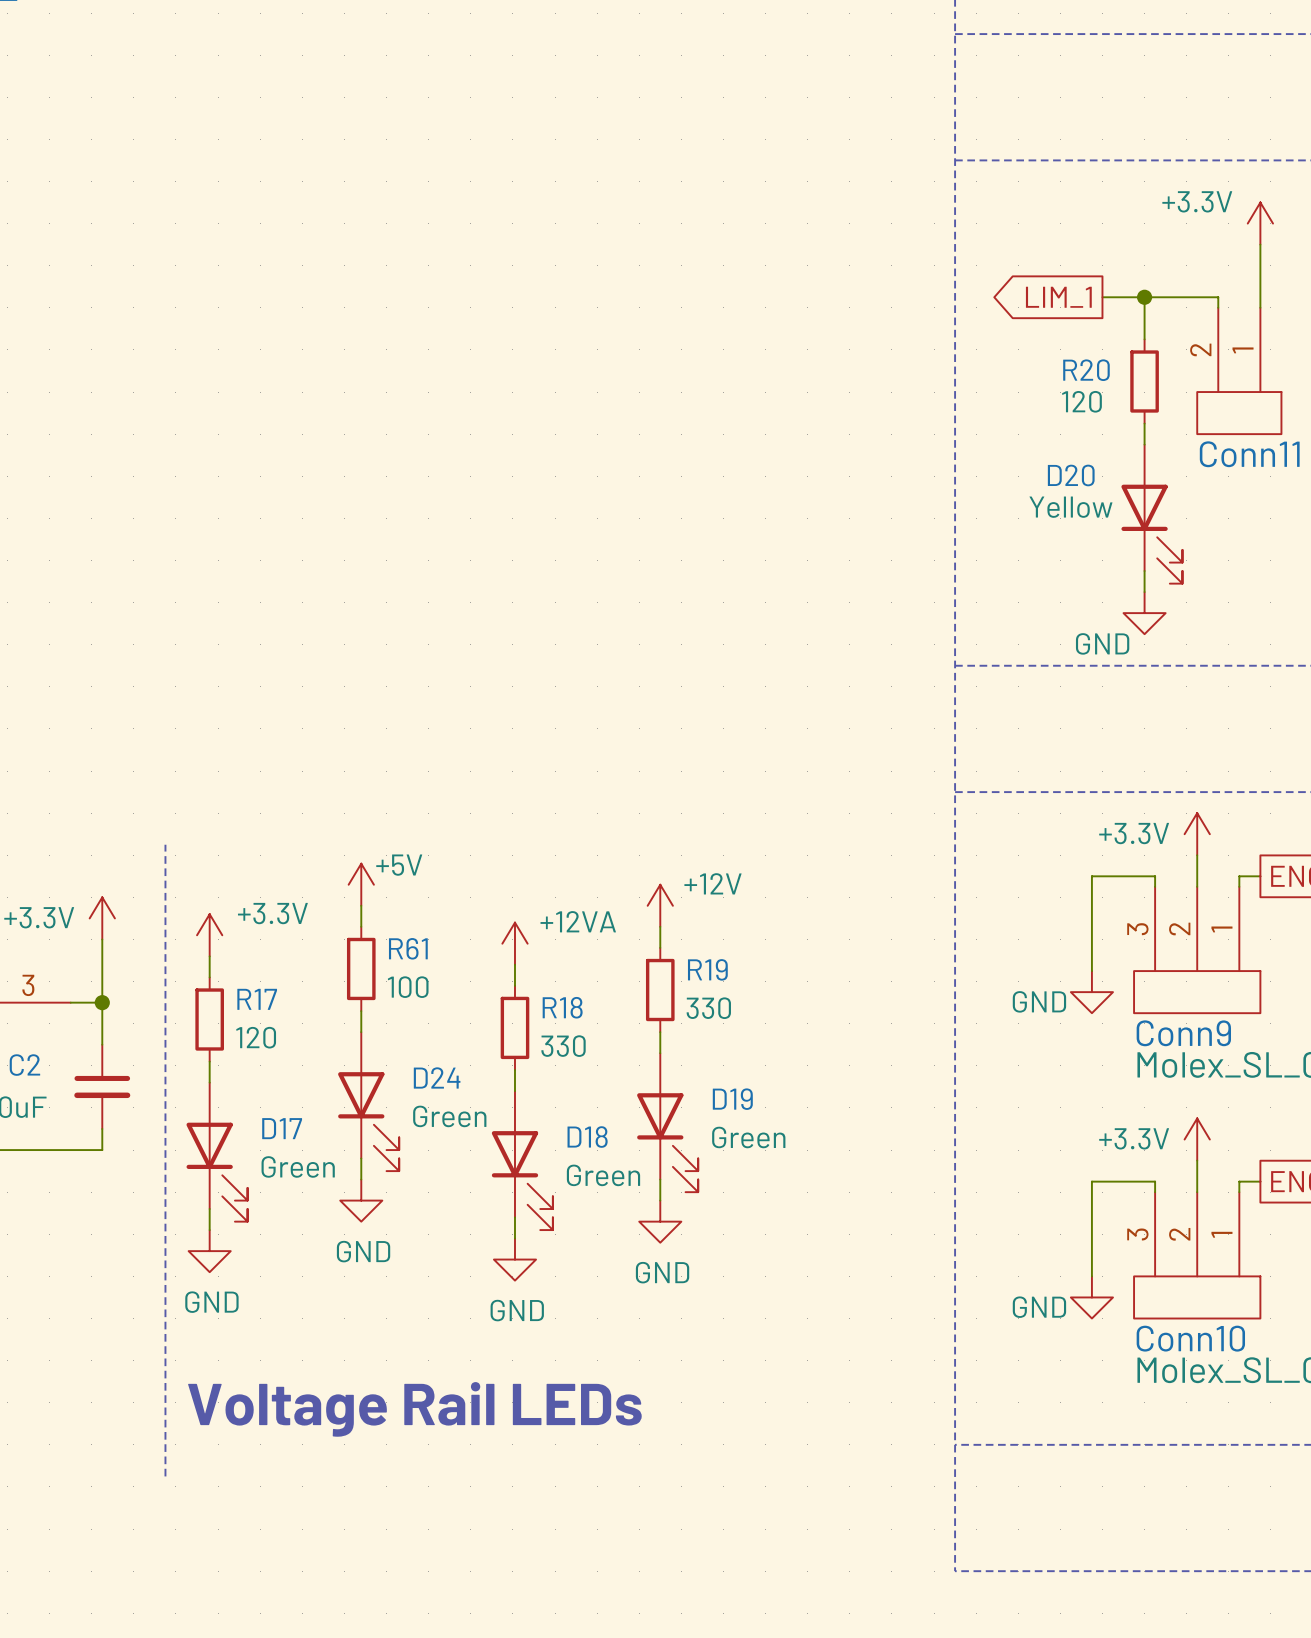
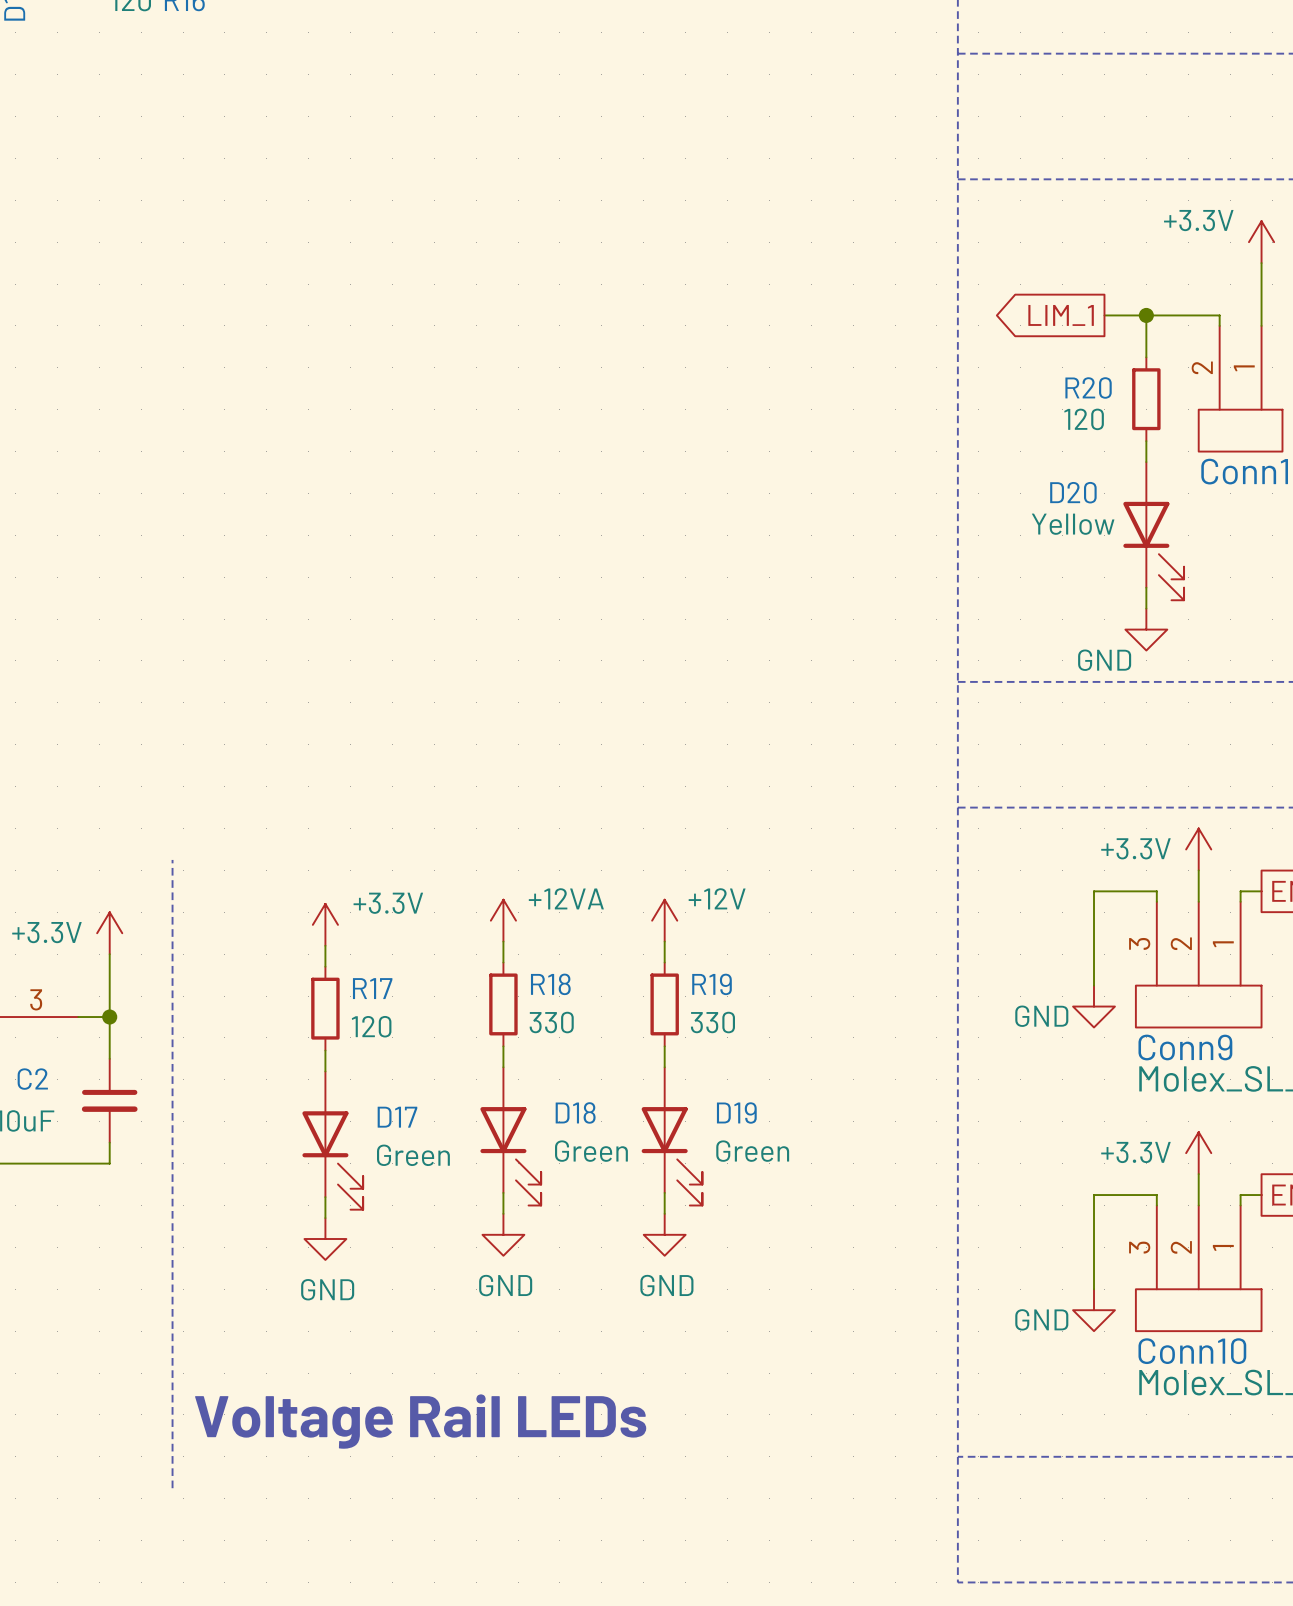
power symbol: +5V (361, 884) -> none
wire: (361, 905) (361, 926) -> (325, 945) (325, 966)
power symbol position: +3.3V (209, 935) -> +3.3V (325, 924)
power symbol position: +12VA (514, 943) -> +12VA (503, 920)
wire: (209, 956) (209, 977) -> none
wire: (514, 964) (514, 985) -> (503, 941) (503, 962)
R61: 100 (361, 968) -> none
wire: (361, 1011) (361, 1032) -> (325, 1050) (325, 1071)
R17 position: (209, 1019) -> (325, 1008)
R18 position: (514, 1027) -> (503, 1004)
wire: (209, 1061) (209, 1082) -> none
wire: (514, 1070) (514, 1091) -> (503, 1046) (503, 1067)
D24: Green (368, 1101) -> none
D17 position: (217, 1152) -> (332, 1140)
wire: (361, 1158) (361, 1179) -> (325, 1197) (325, 1218)
D18 position: (522, 1160) -> (510, 1136)
power symbol position: GND (361, 1200) -> GND (325, 1239)
wire: (209, 1209) (209, 1230) -> none
wire: (514, 1217) (514, 1238) -> (503, 1192) (503, 1213)
power symbol: GND (209, 1251) -> none
power symbol position: GND (514, 1259) -> GND (503, 1234)

